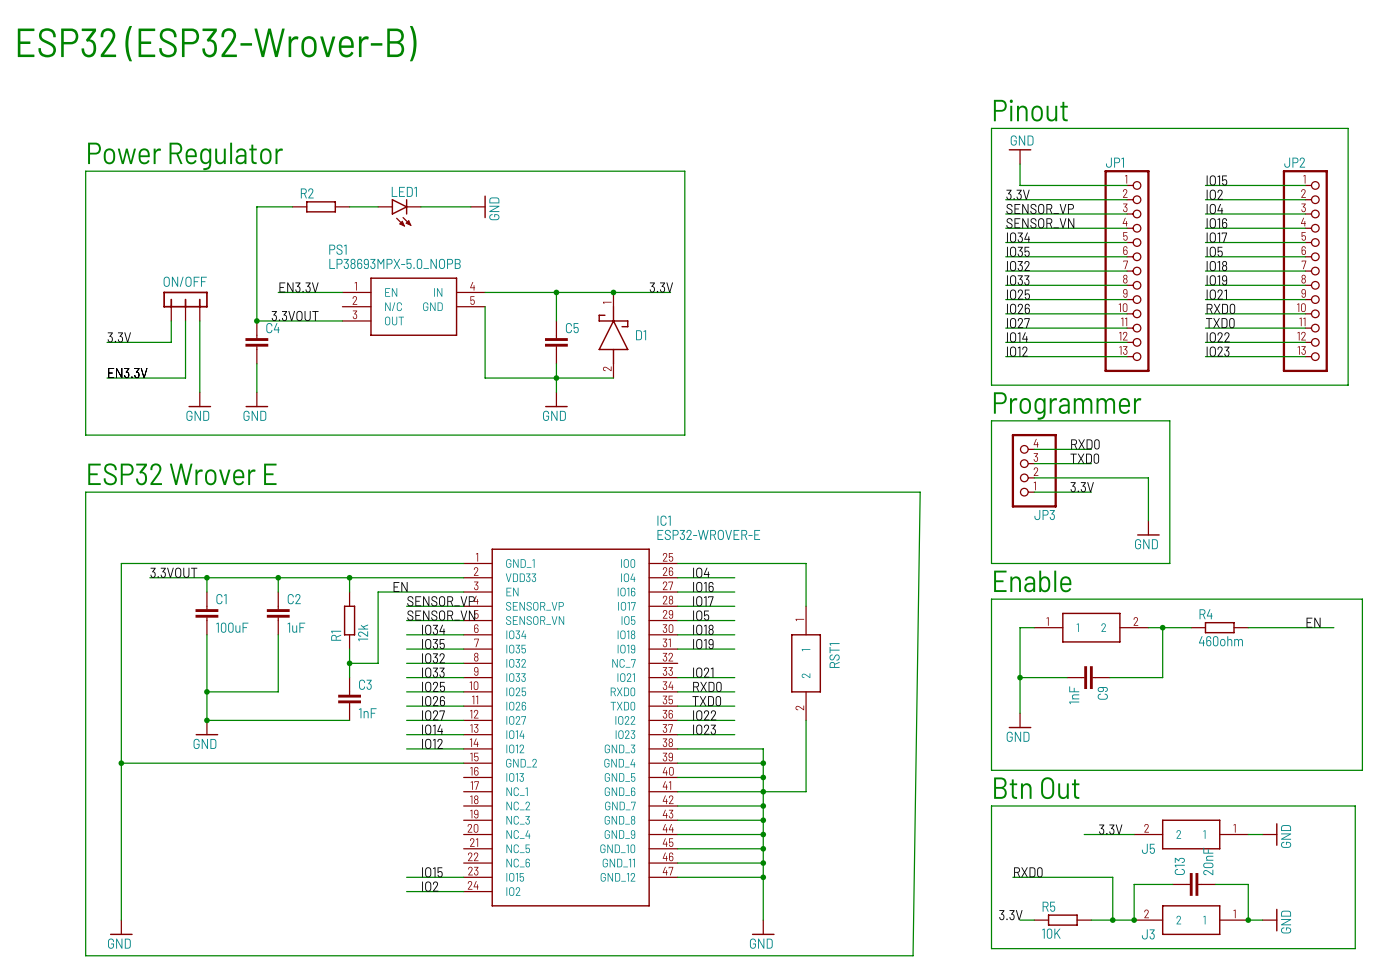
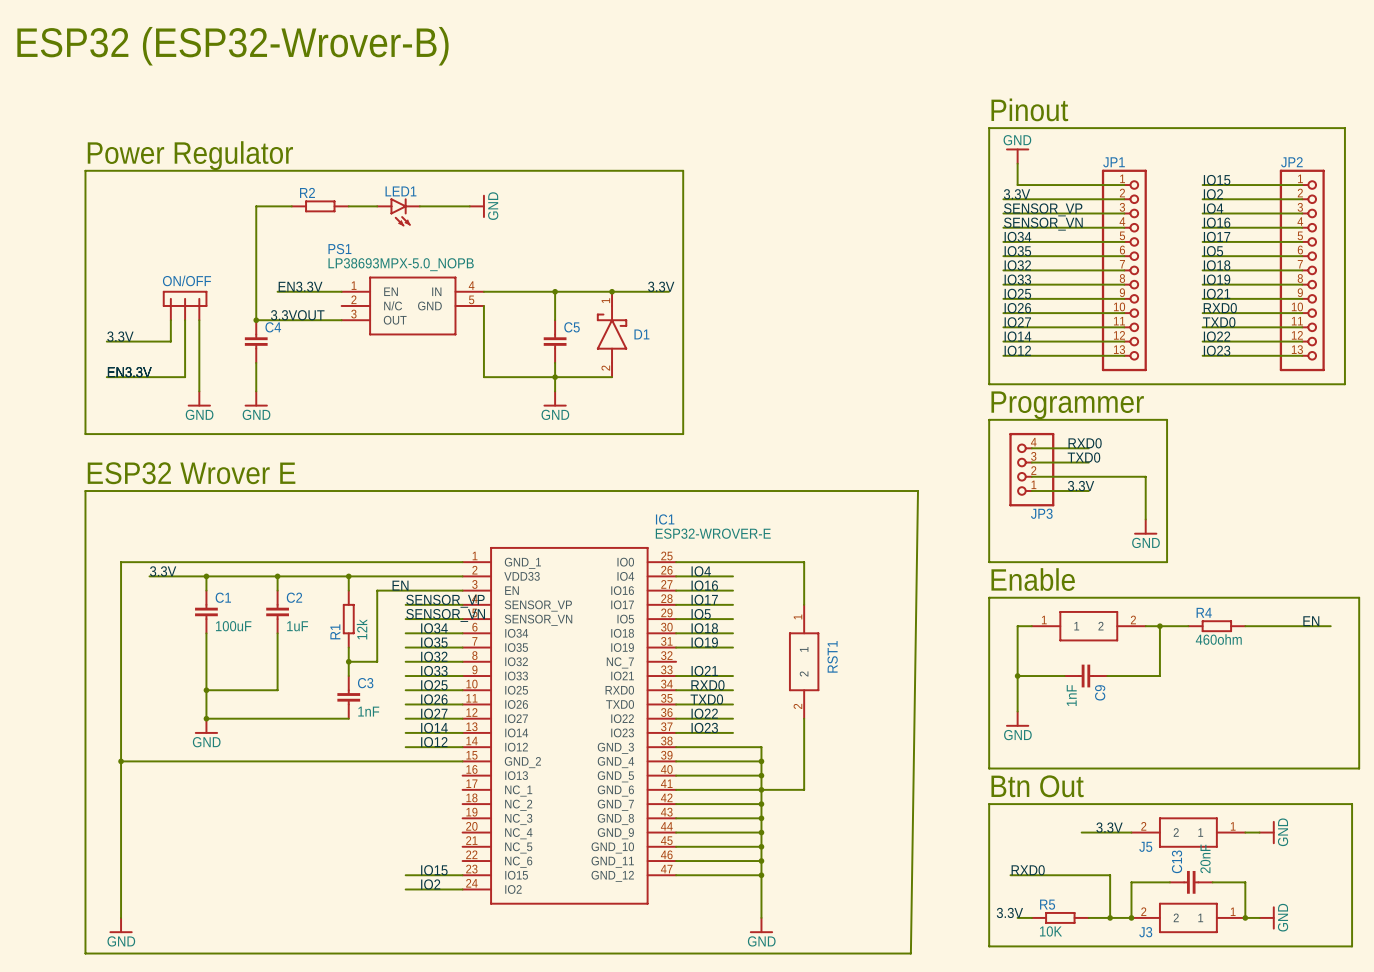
label: 3.3VOUT (173, 572) -> 3.3V (163, 571)

